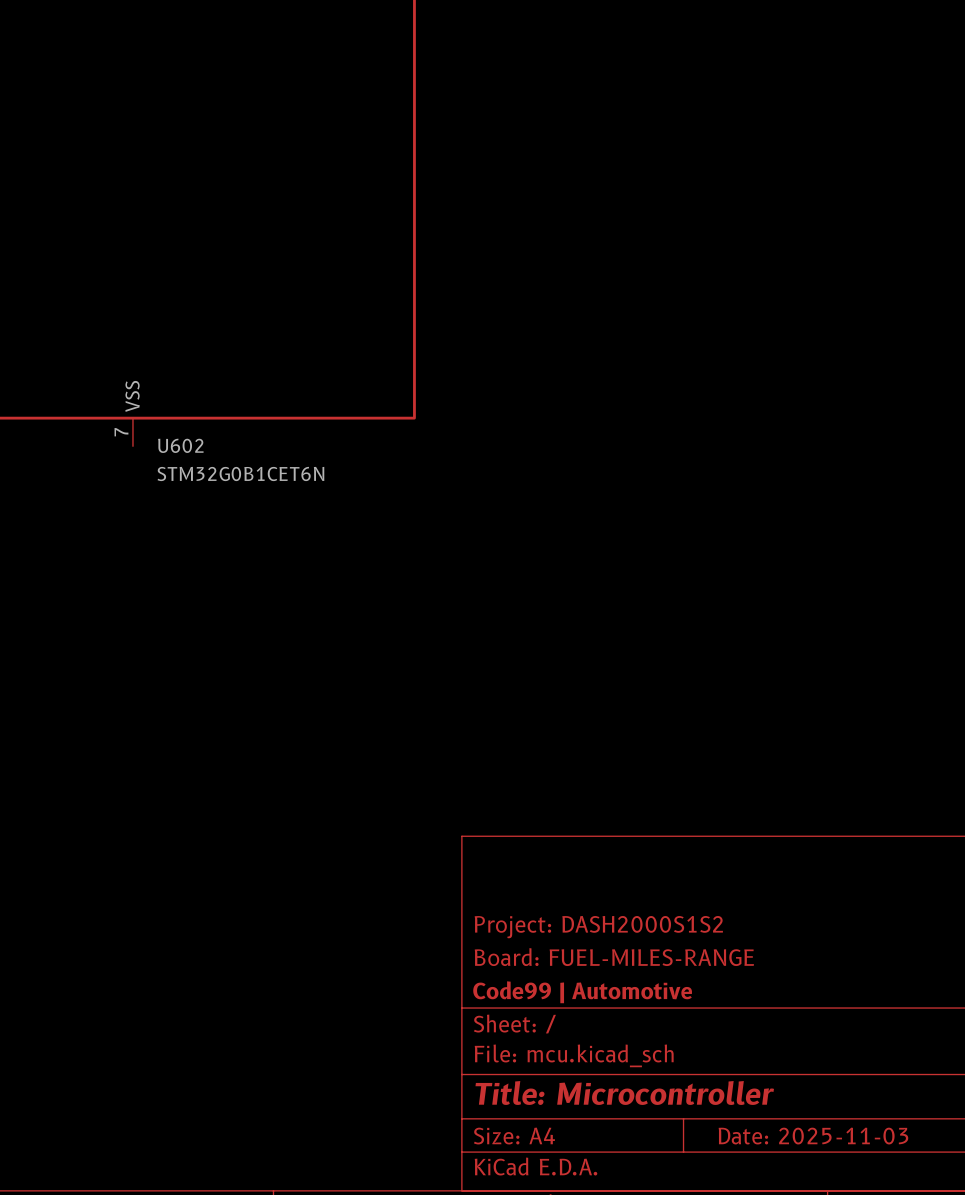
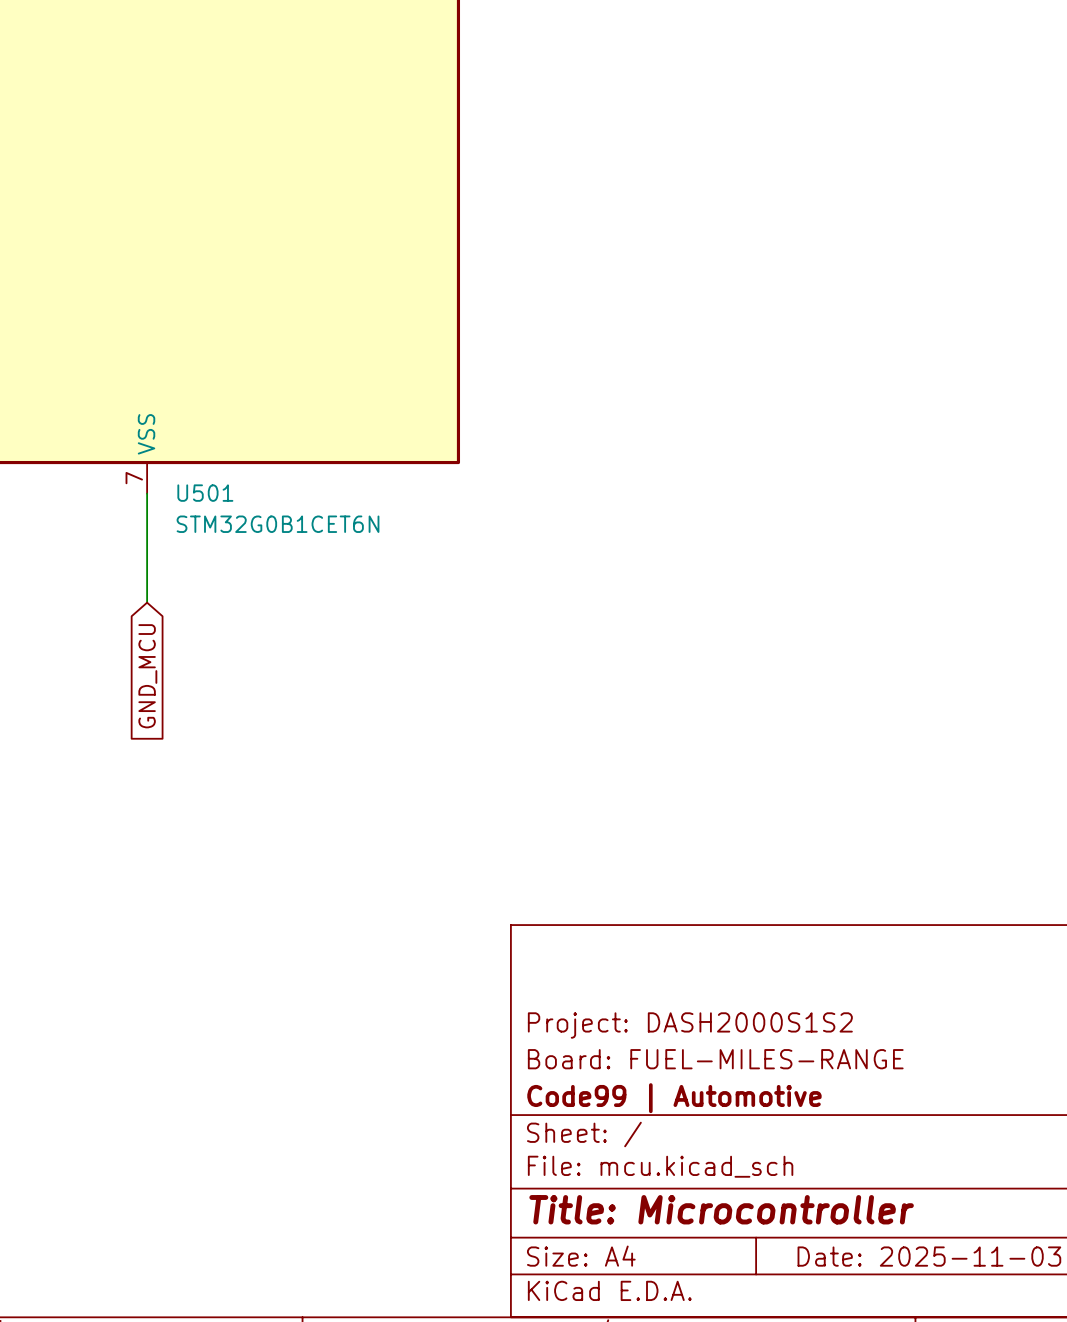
U602 name: U602 (180, 445) -> U501 (205, 493)
wire: none -> (147, 493) (147, 602)
global label: none -> GND_MCU (147, 676)

